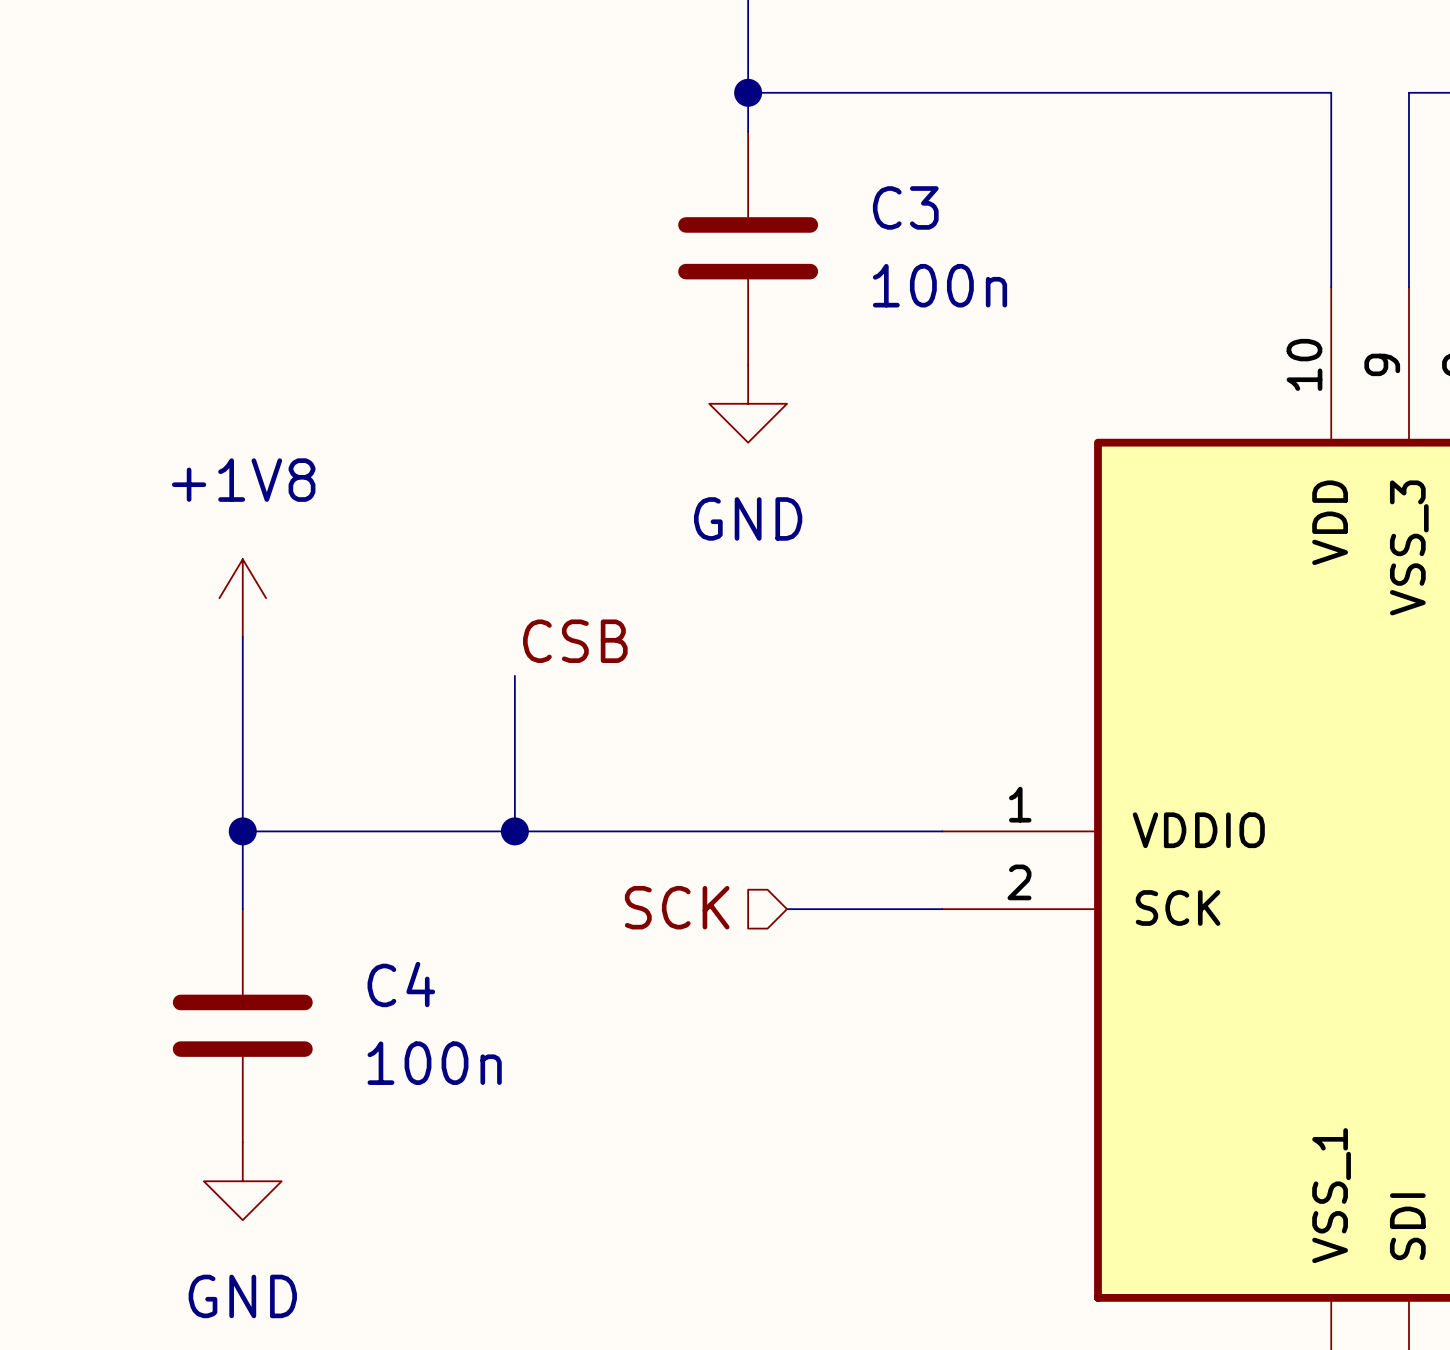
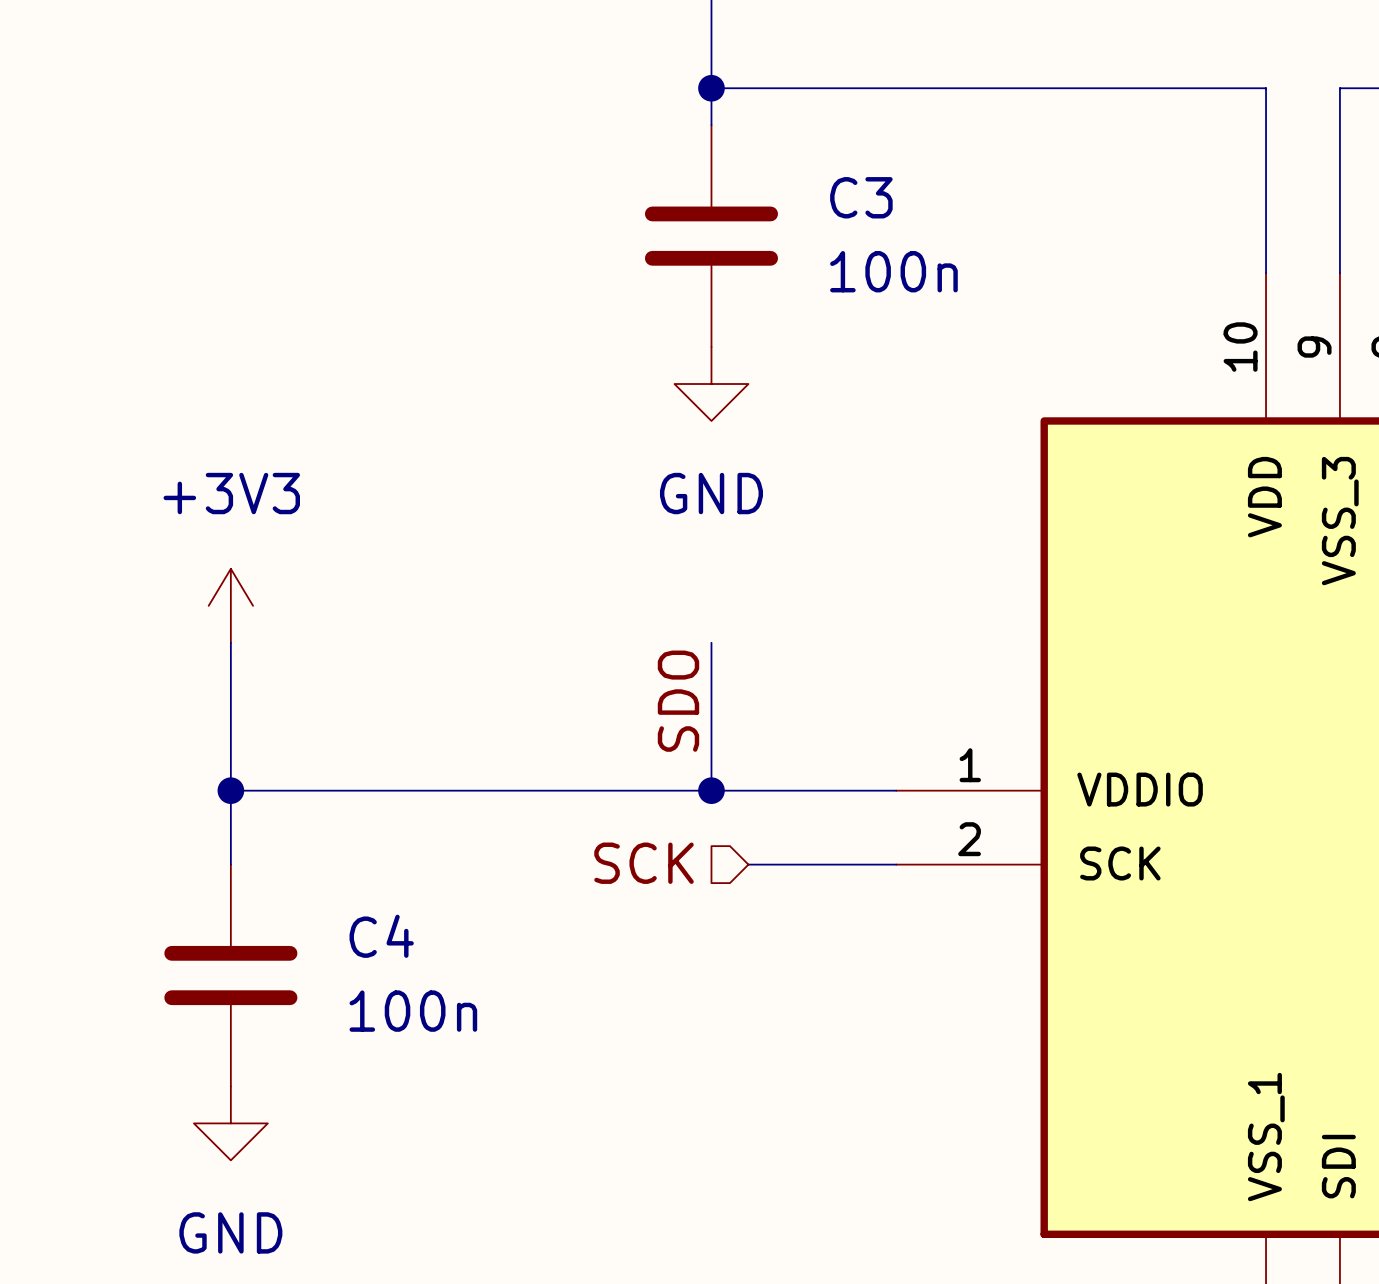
power symbol: +1V8 (242, 598) -> none
power symbol: none -> +3V3 (230, 605)
label: CSB (575, 641) -> none
wire: (514, 675) (514, 831) -> (711, 642) (711, 790)
label: none -> SDO (678, 701)
junction: (514, 831) -> none
junction: none -> (711, 790)

